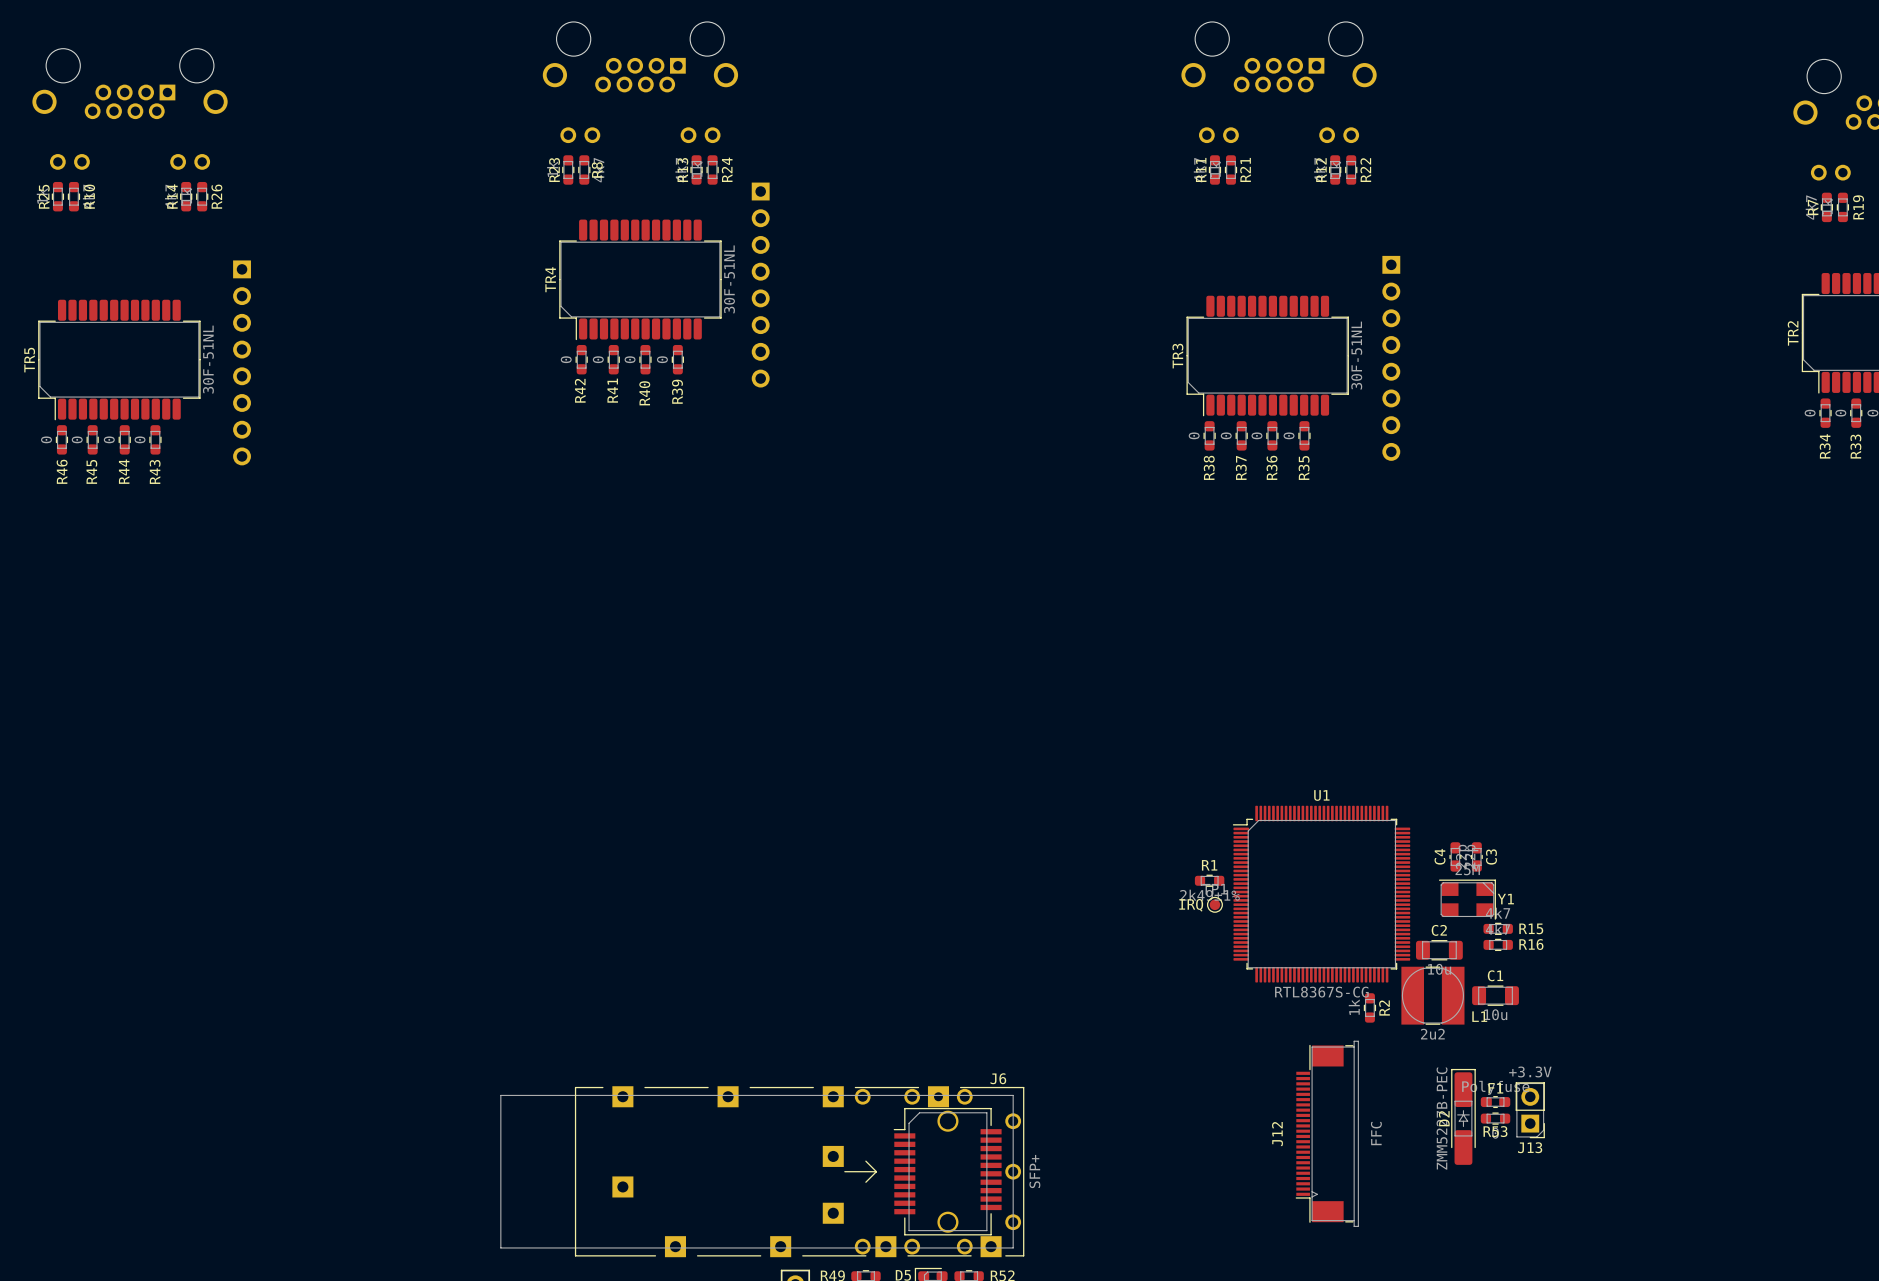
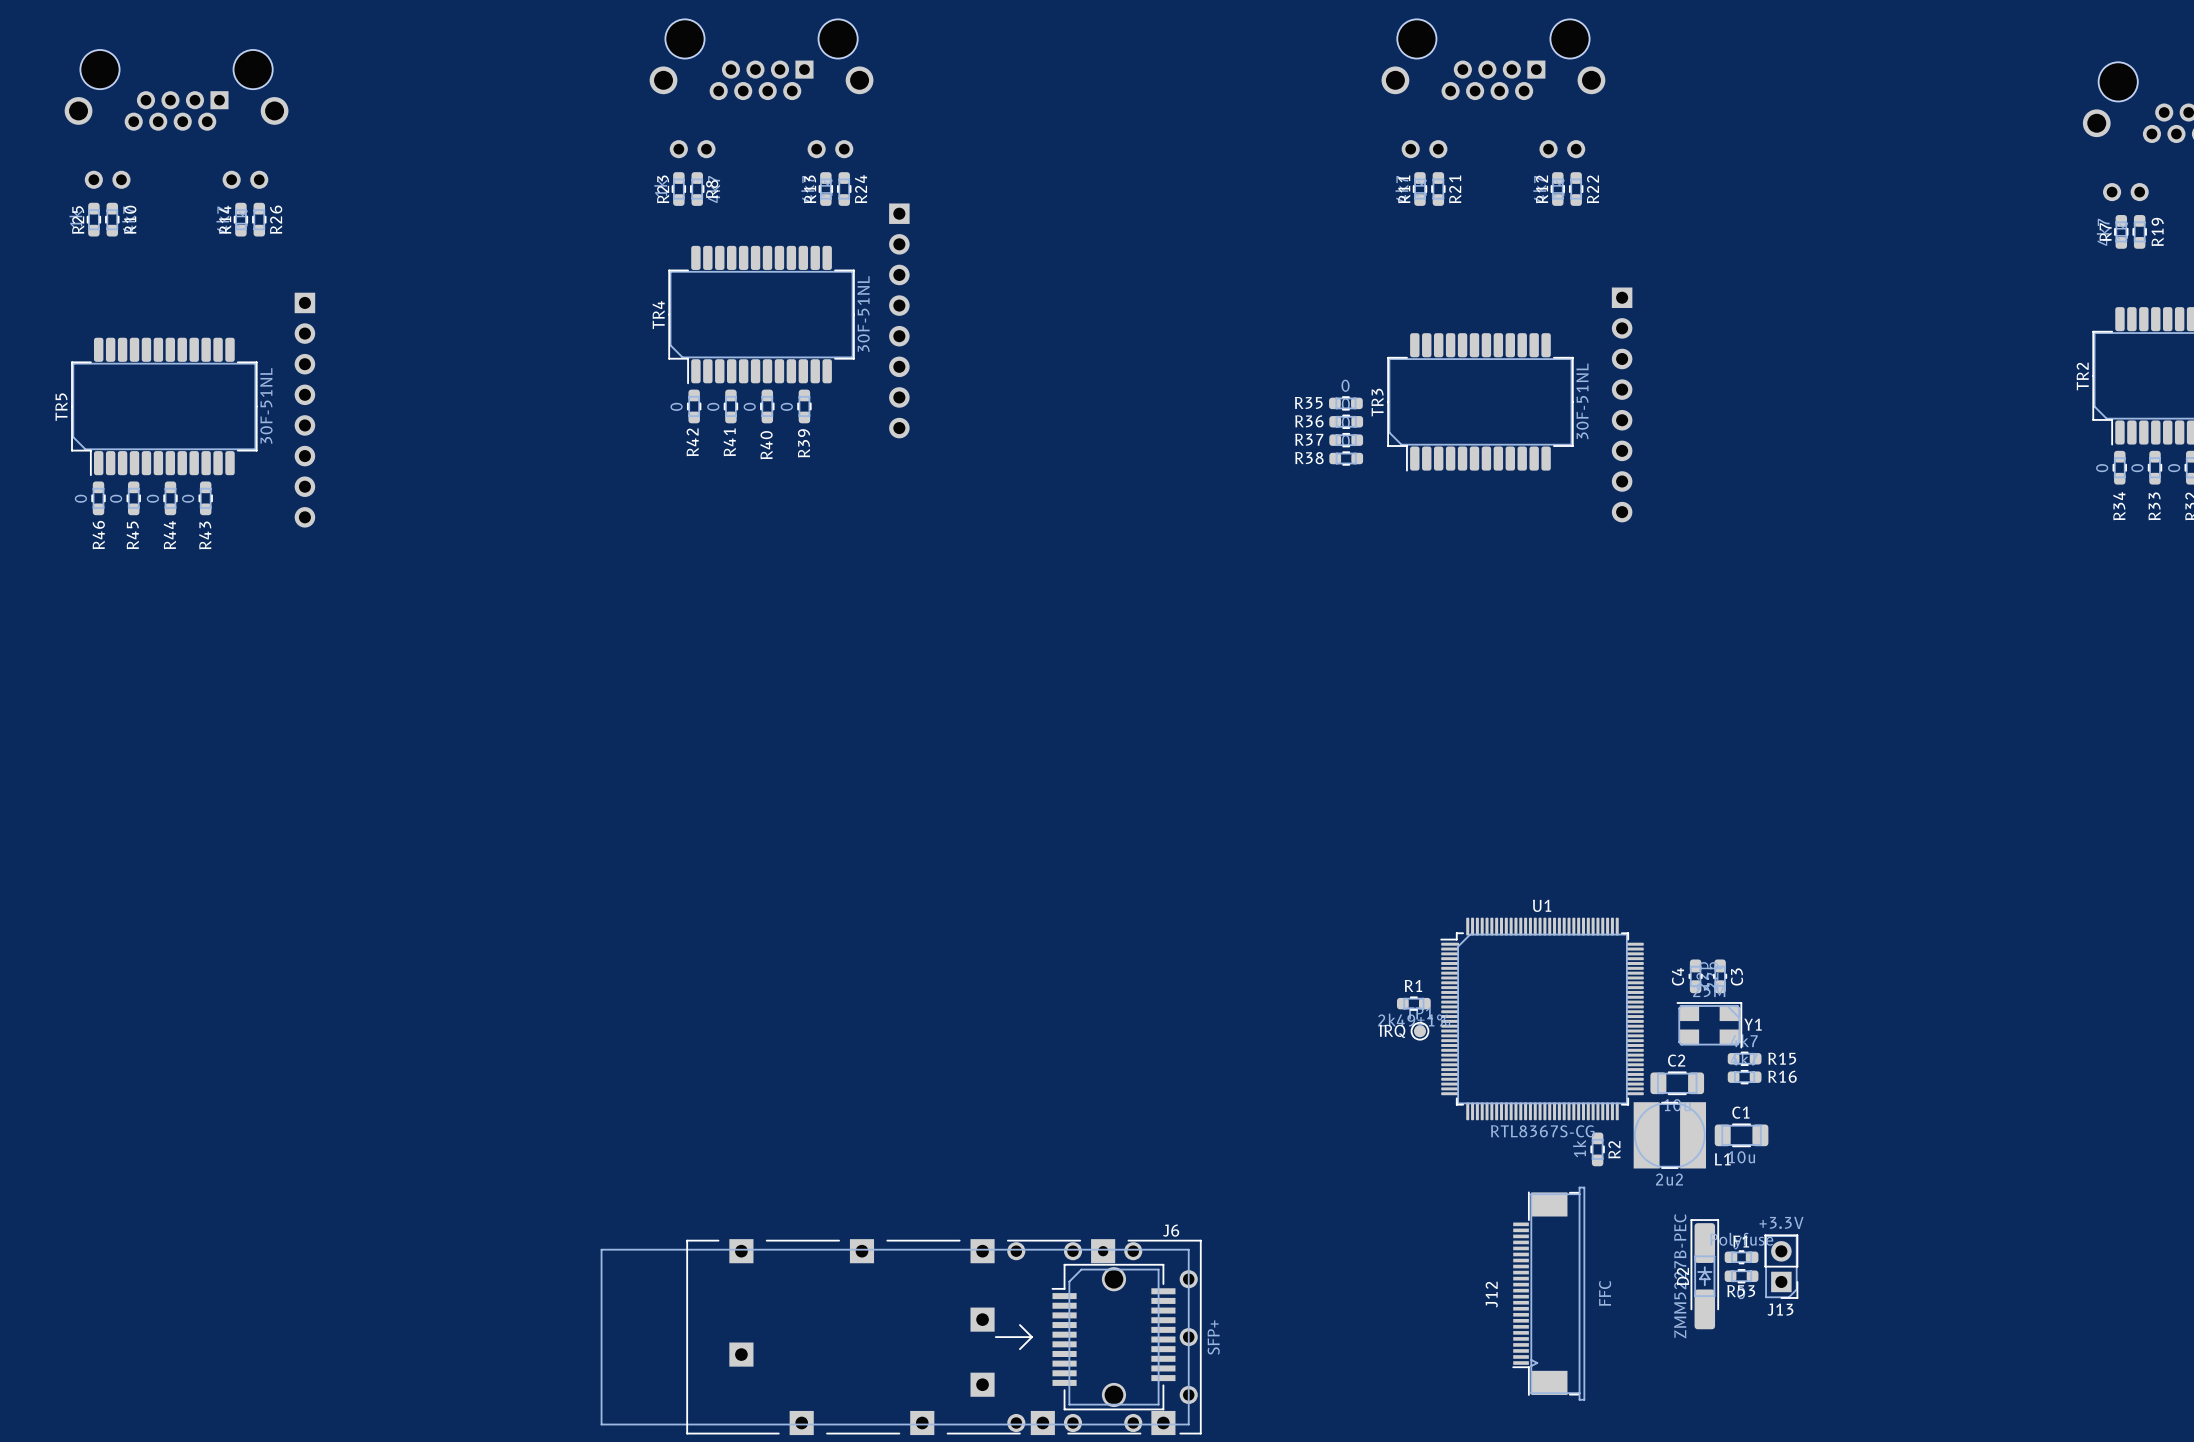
R38 rotation: 0° (1209, 435) -> 90° clockwise (1346, 458)
R38 position: (1209, 435) -> (1346, 458)
R37 rotation: 0° (1241, 435) -> 90° clockwise (1346, 440)
R37 position: (1241, 435) -> (1346, 440)
R36 rotation: 0° (1272, 435) -> 90° clockwise (1346, 421)
R36 position: (1272, 435) -> (1346, 421)
R35 rotation: 0° (1304, 435) -> 90° clockwise (1345, 403)
R35 position: (1304, 435) -> (1345, 403)

